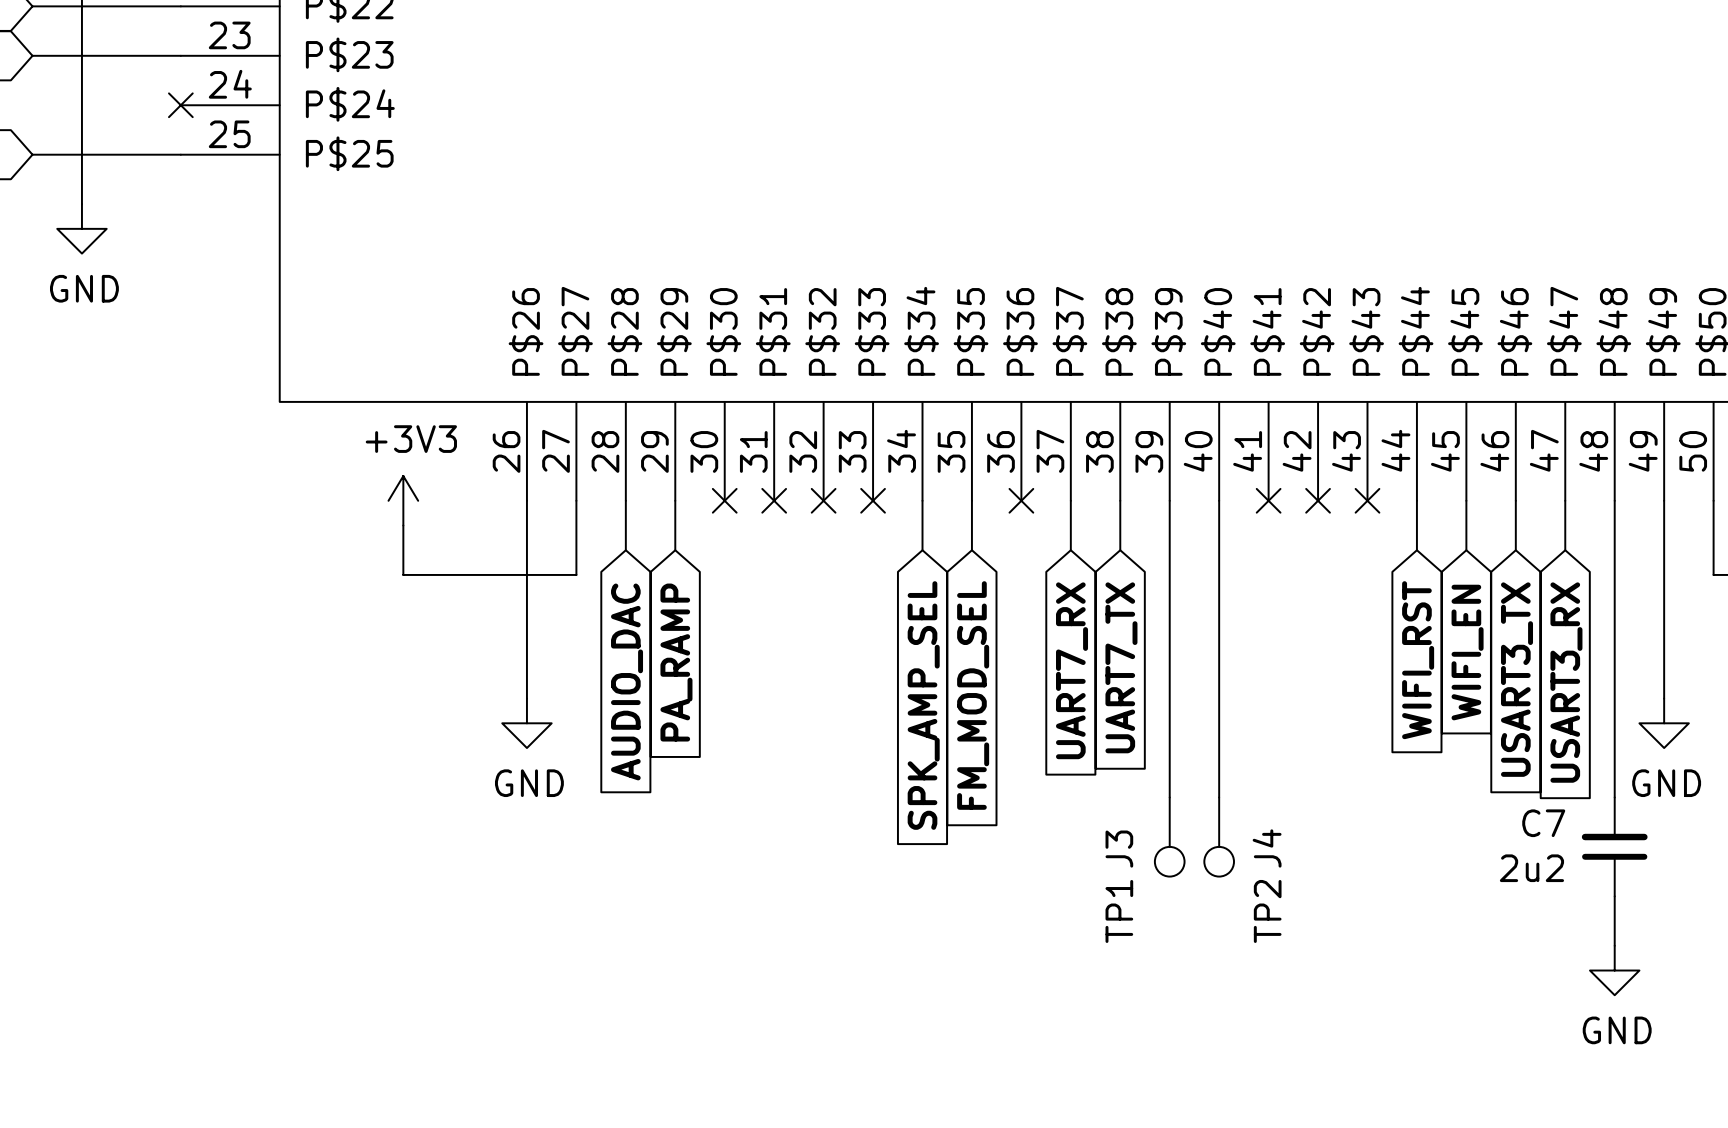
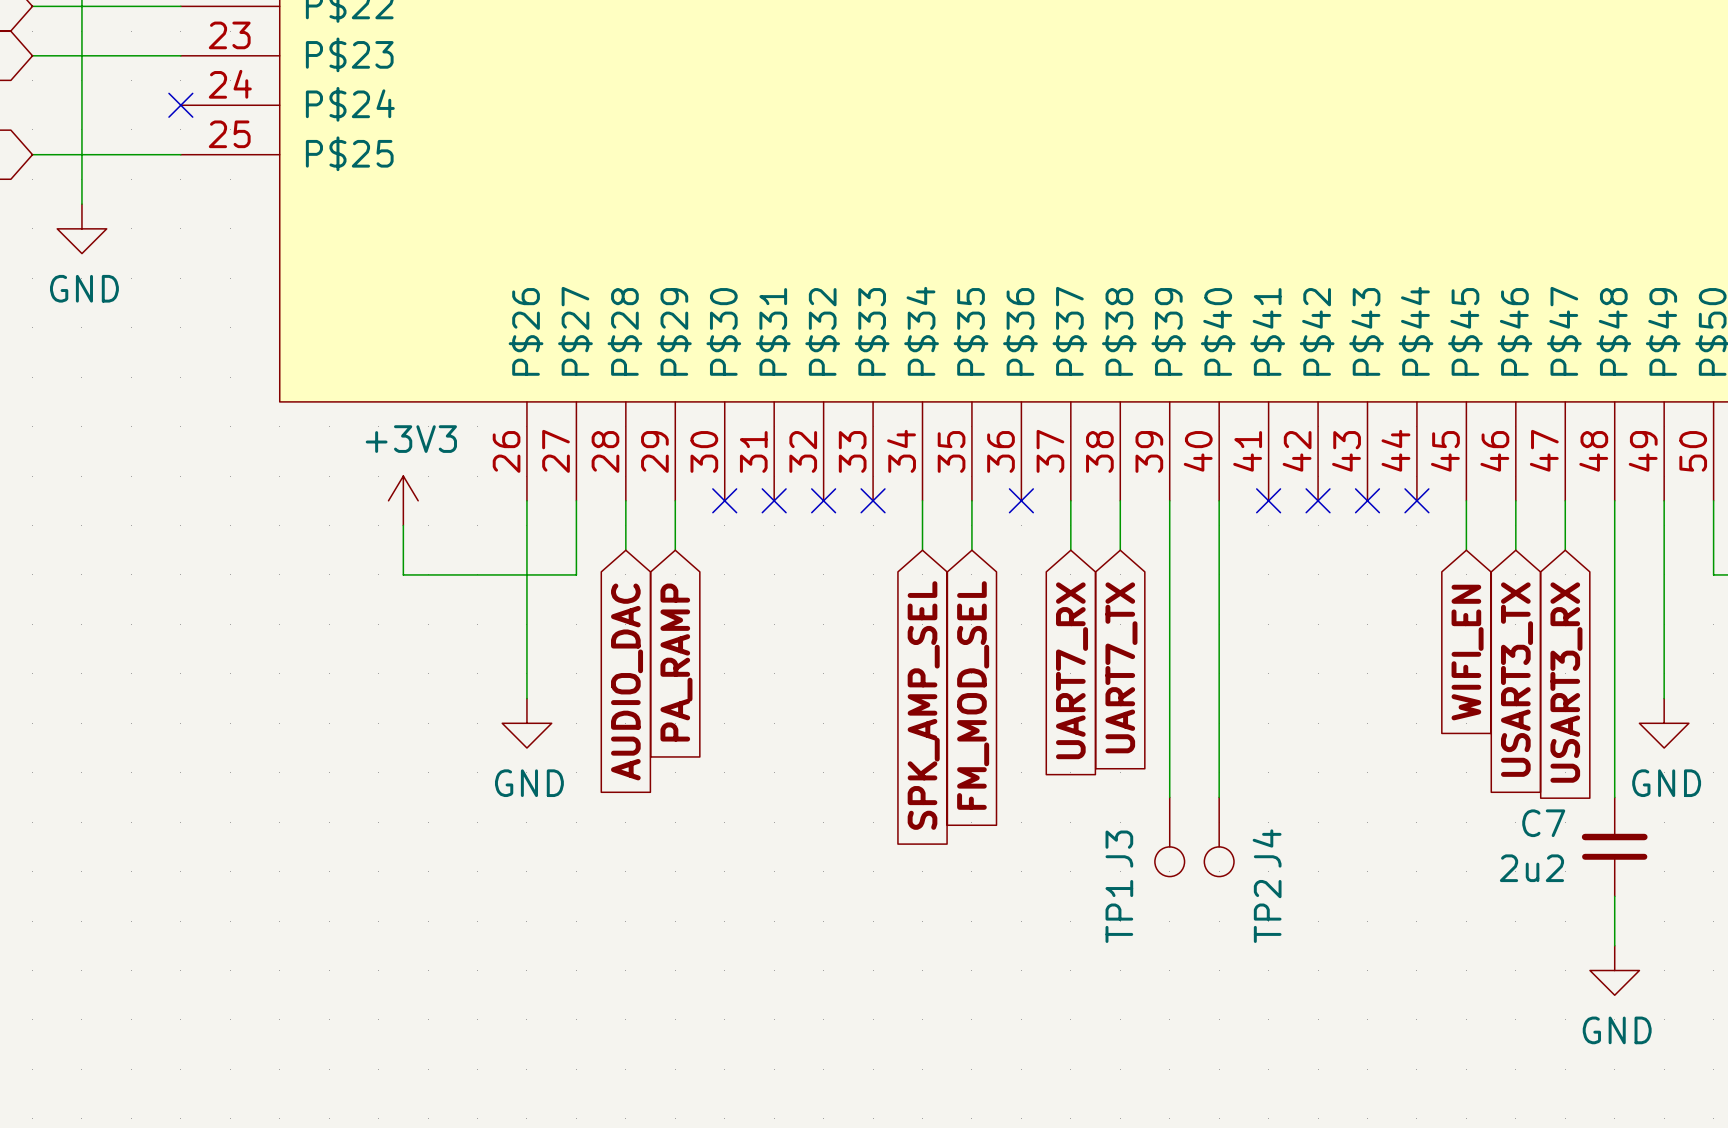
wire: (1416, 500) (1416, 550) -> none
no-connect mark: none -> (1416, 500)
global label: WIFI_RST (1418, 660) -> none

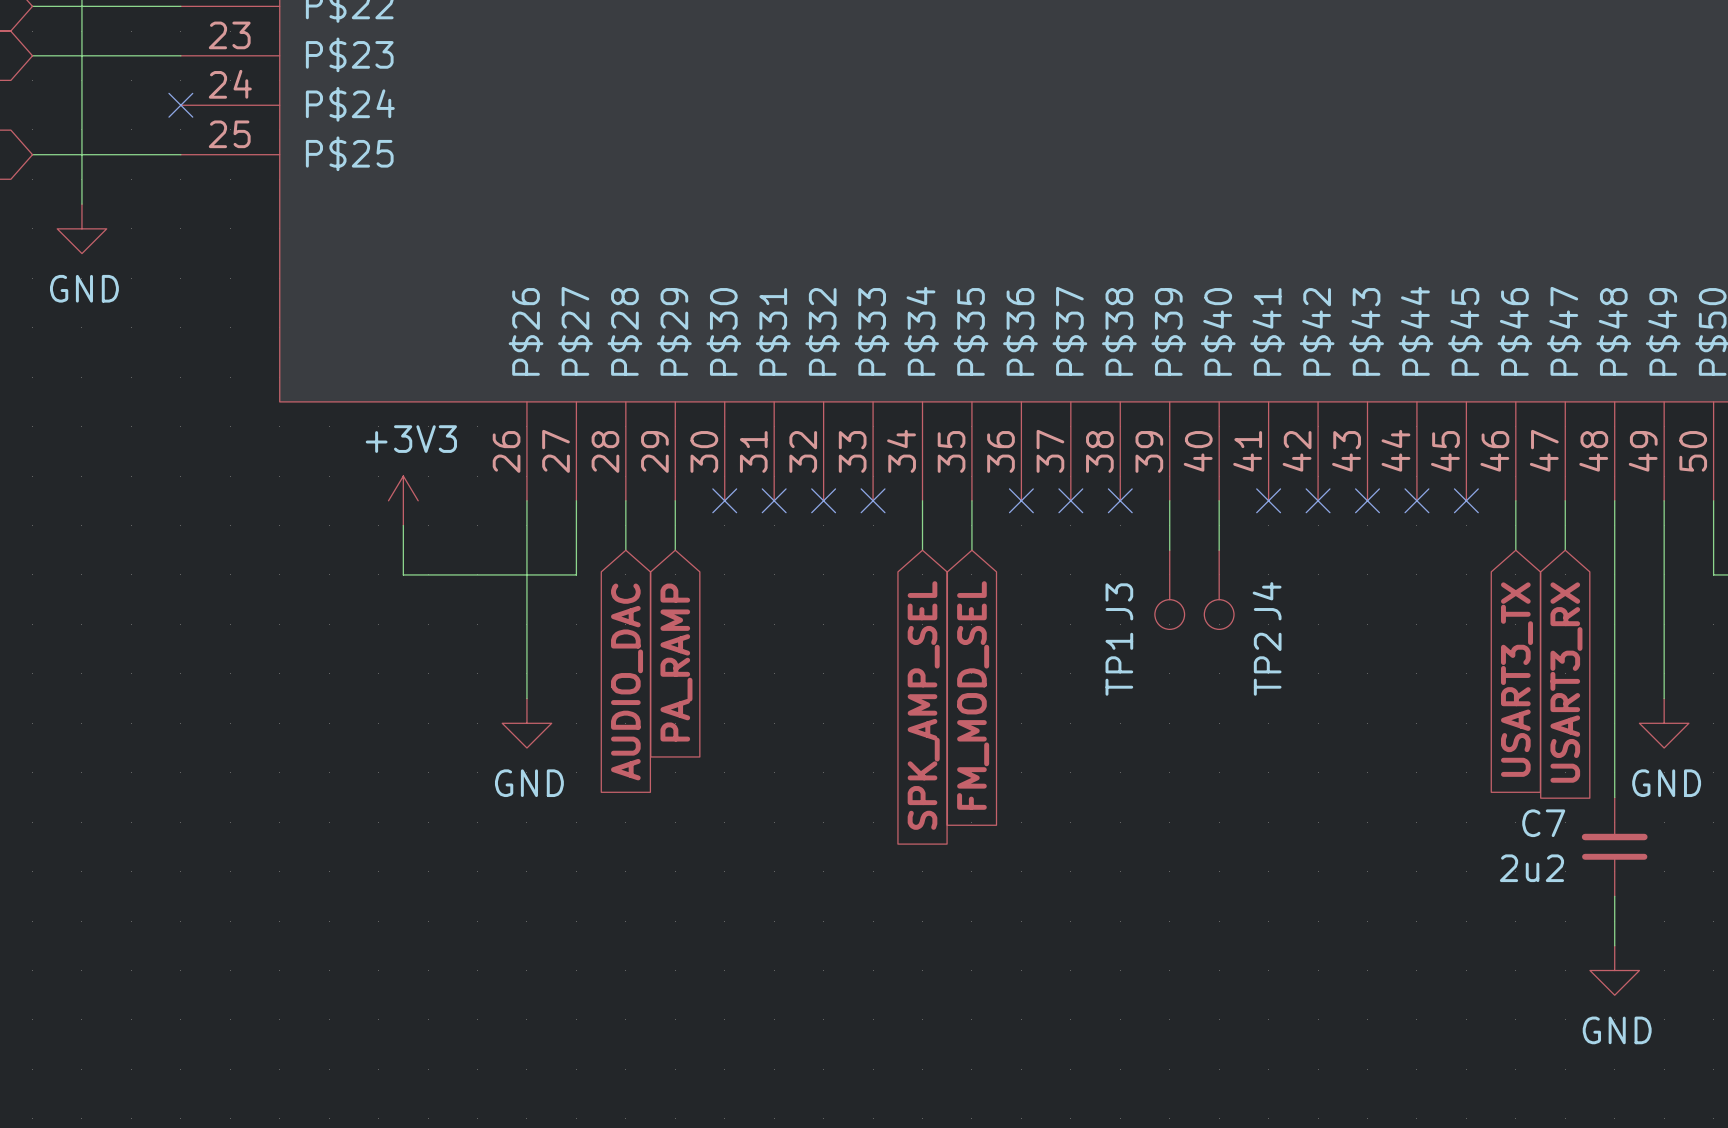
wire: (1070, 500) (1070, 550) -> none
no-connect mark: none -> (1070, 500)
wire: (1120, 500) (1120, 550) -> none
no-connect mark: none -> (1120, 500)
wire: (1466, 500) (1466, 550) -> none
no-connect mark: none -> (1466, 500)
wire: (1169, 550) (1169, 797) -> none
wire: (1219, 550) (1219, 797) -> none
global label: WIFI_EN (1467, 652) -> none
global label: UART7_TX (1121, 667) -> none
global label: UART7_RX (1072, 670) -> none
J3 position: (1169, 837) -> (1169, 589)
J4 position: (1219, 837) -> (1219, 589)

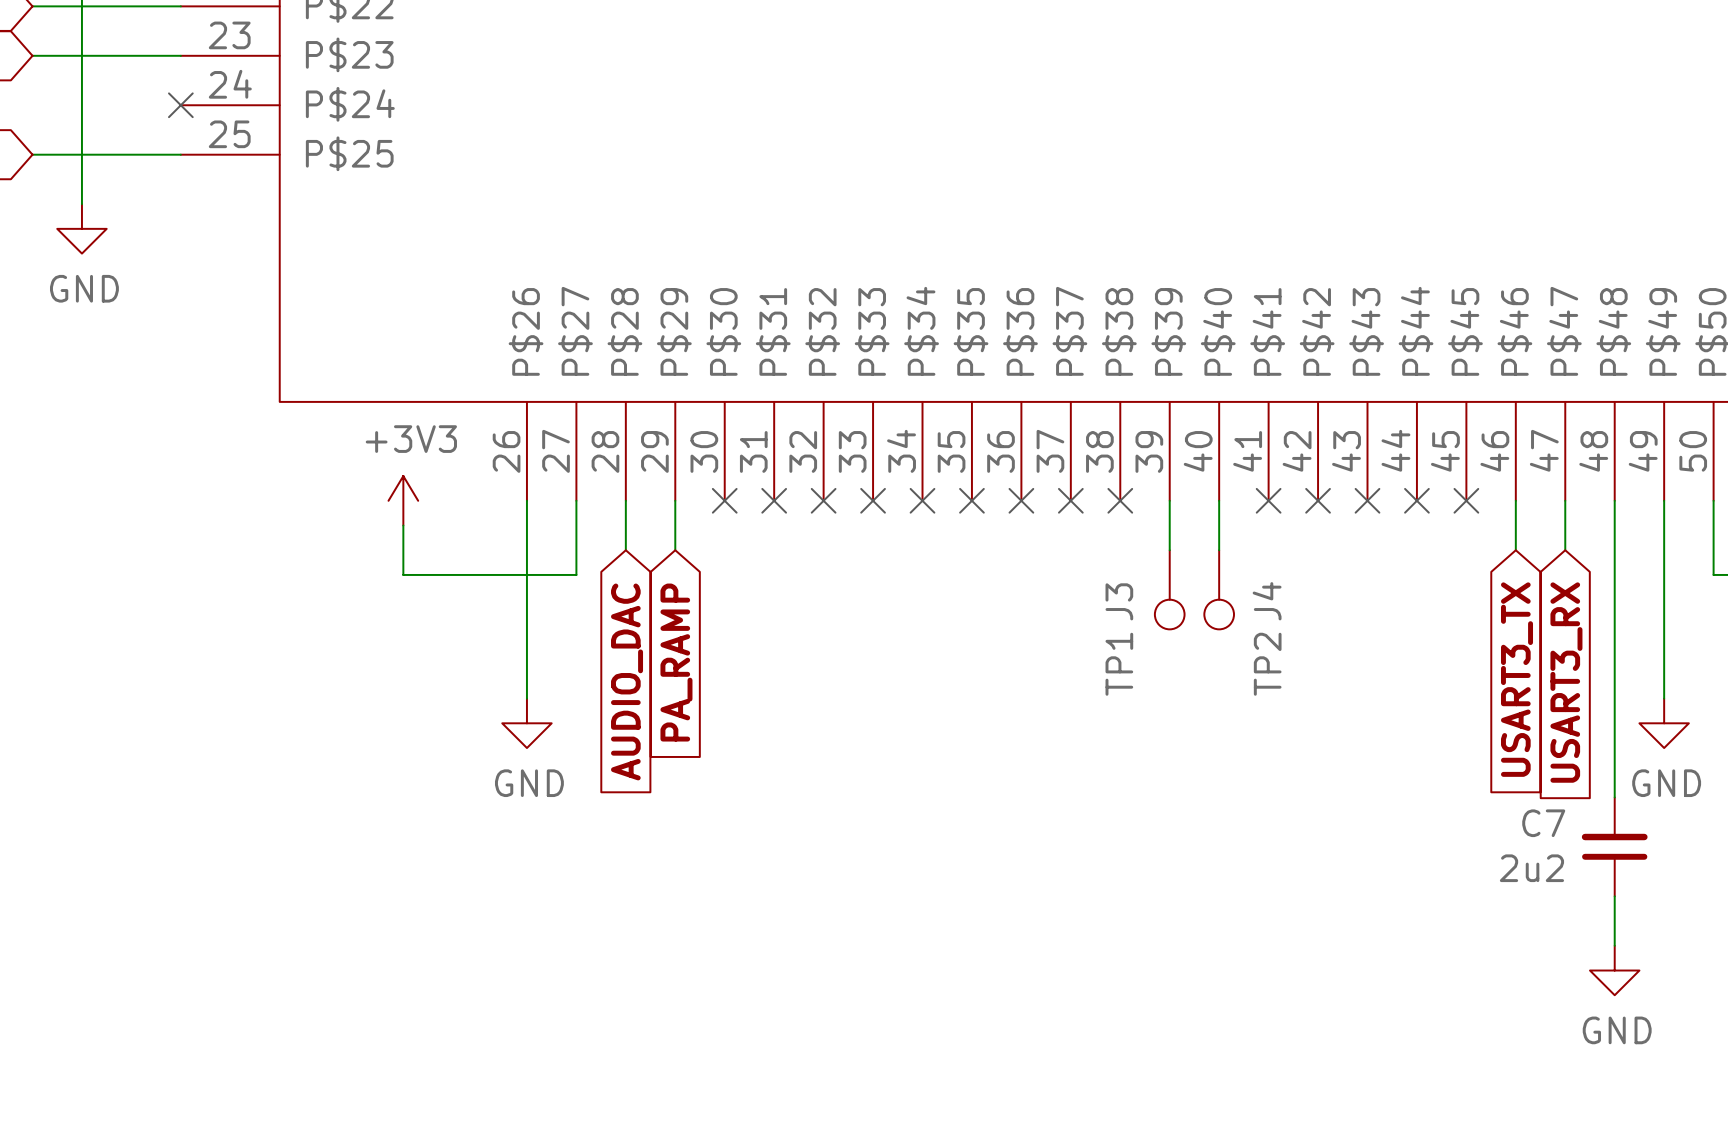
wire: (922, 500) (922, 550) -> none
no-connect mark: none -> (922, 500)
wire: (971, 500) (971, 550) -> none
no-connect mark: none -> (971, 500)
global label: FM_MOD_SEL (973, 695) -> none
global label: SPK_AMP_SEL (923, 705) -> none

